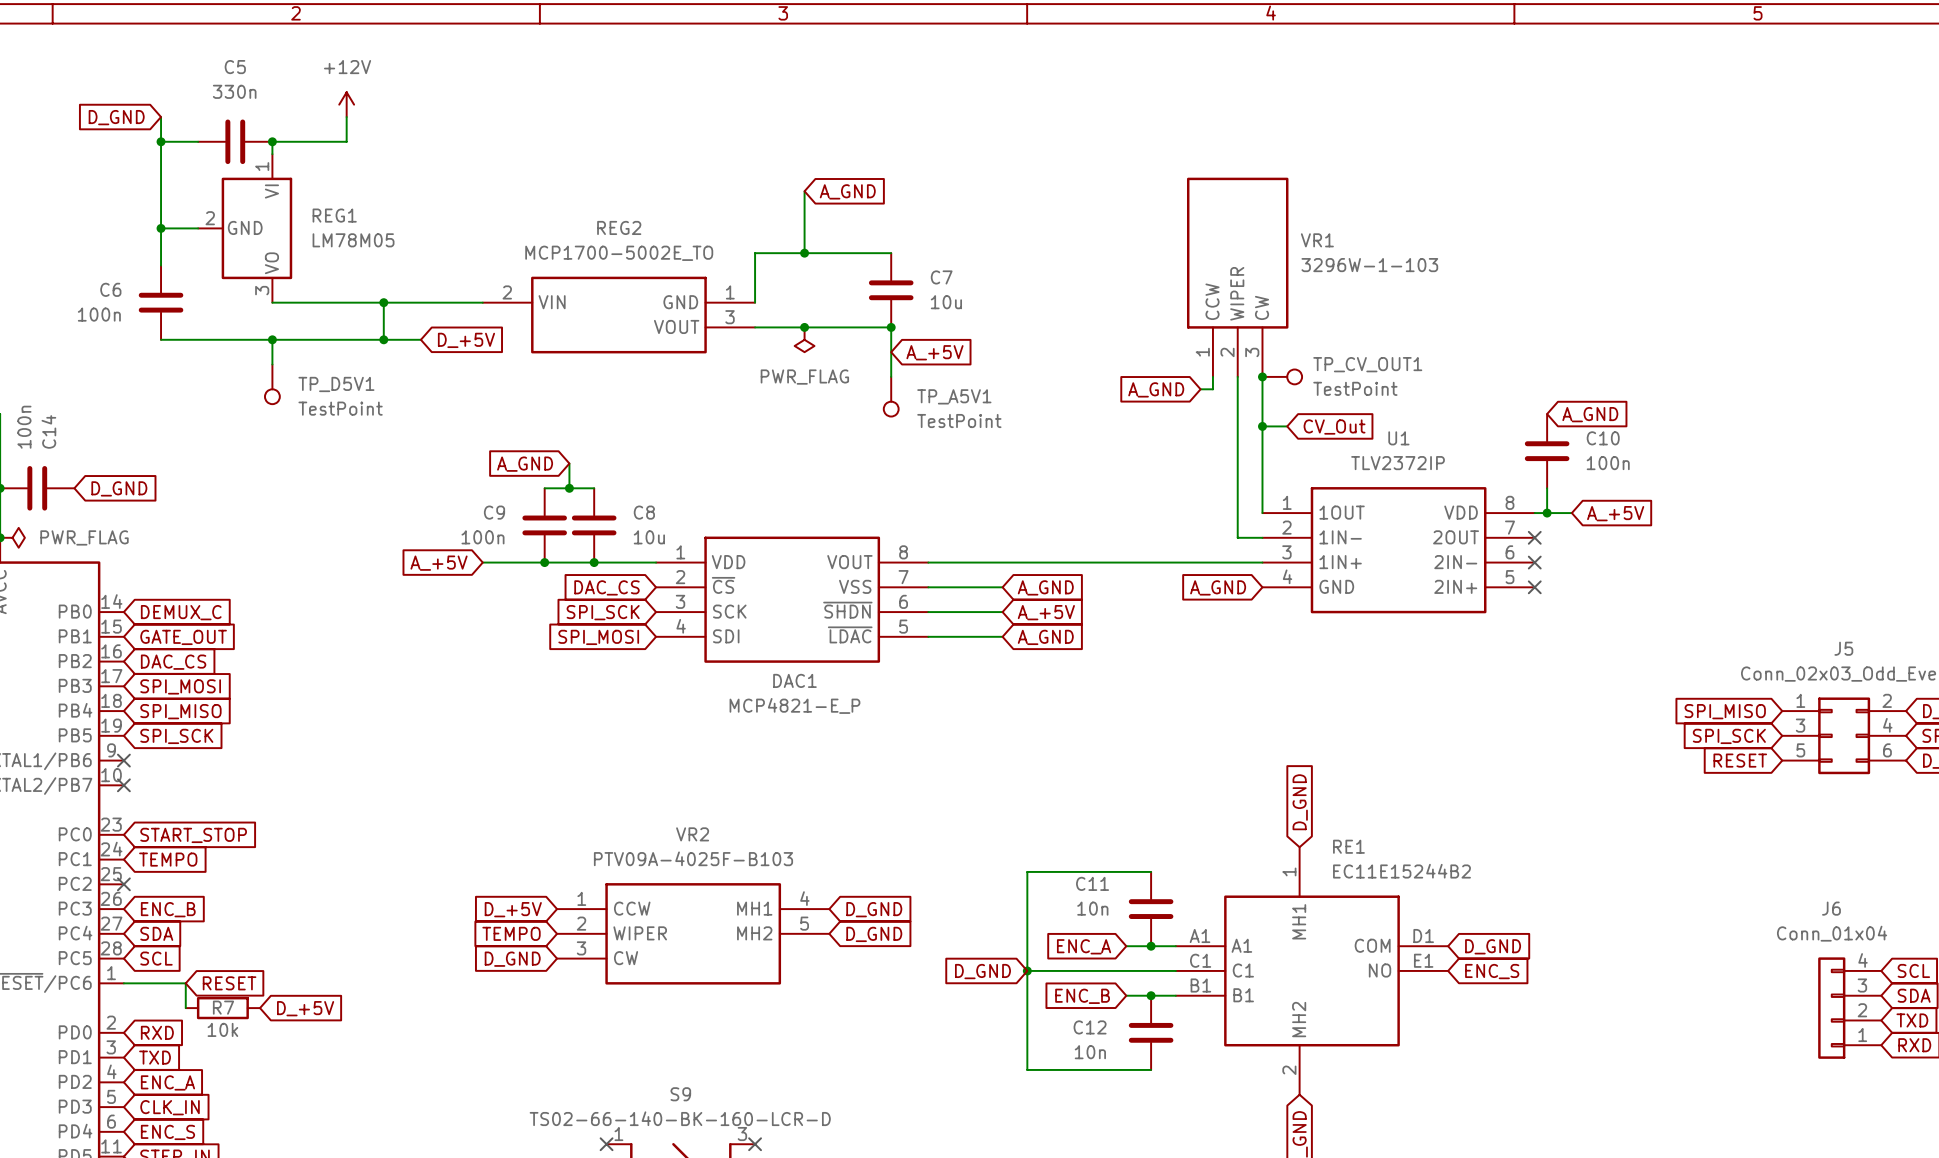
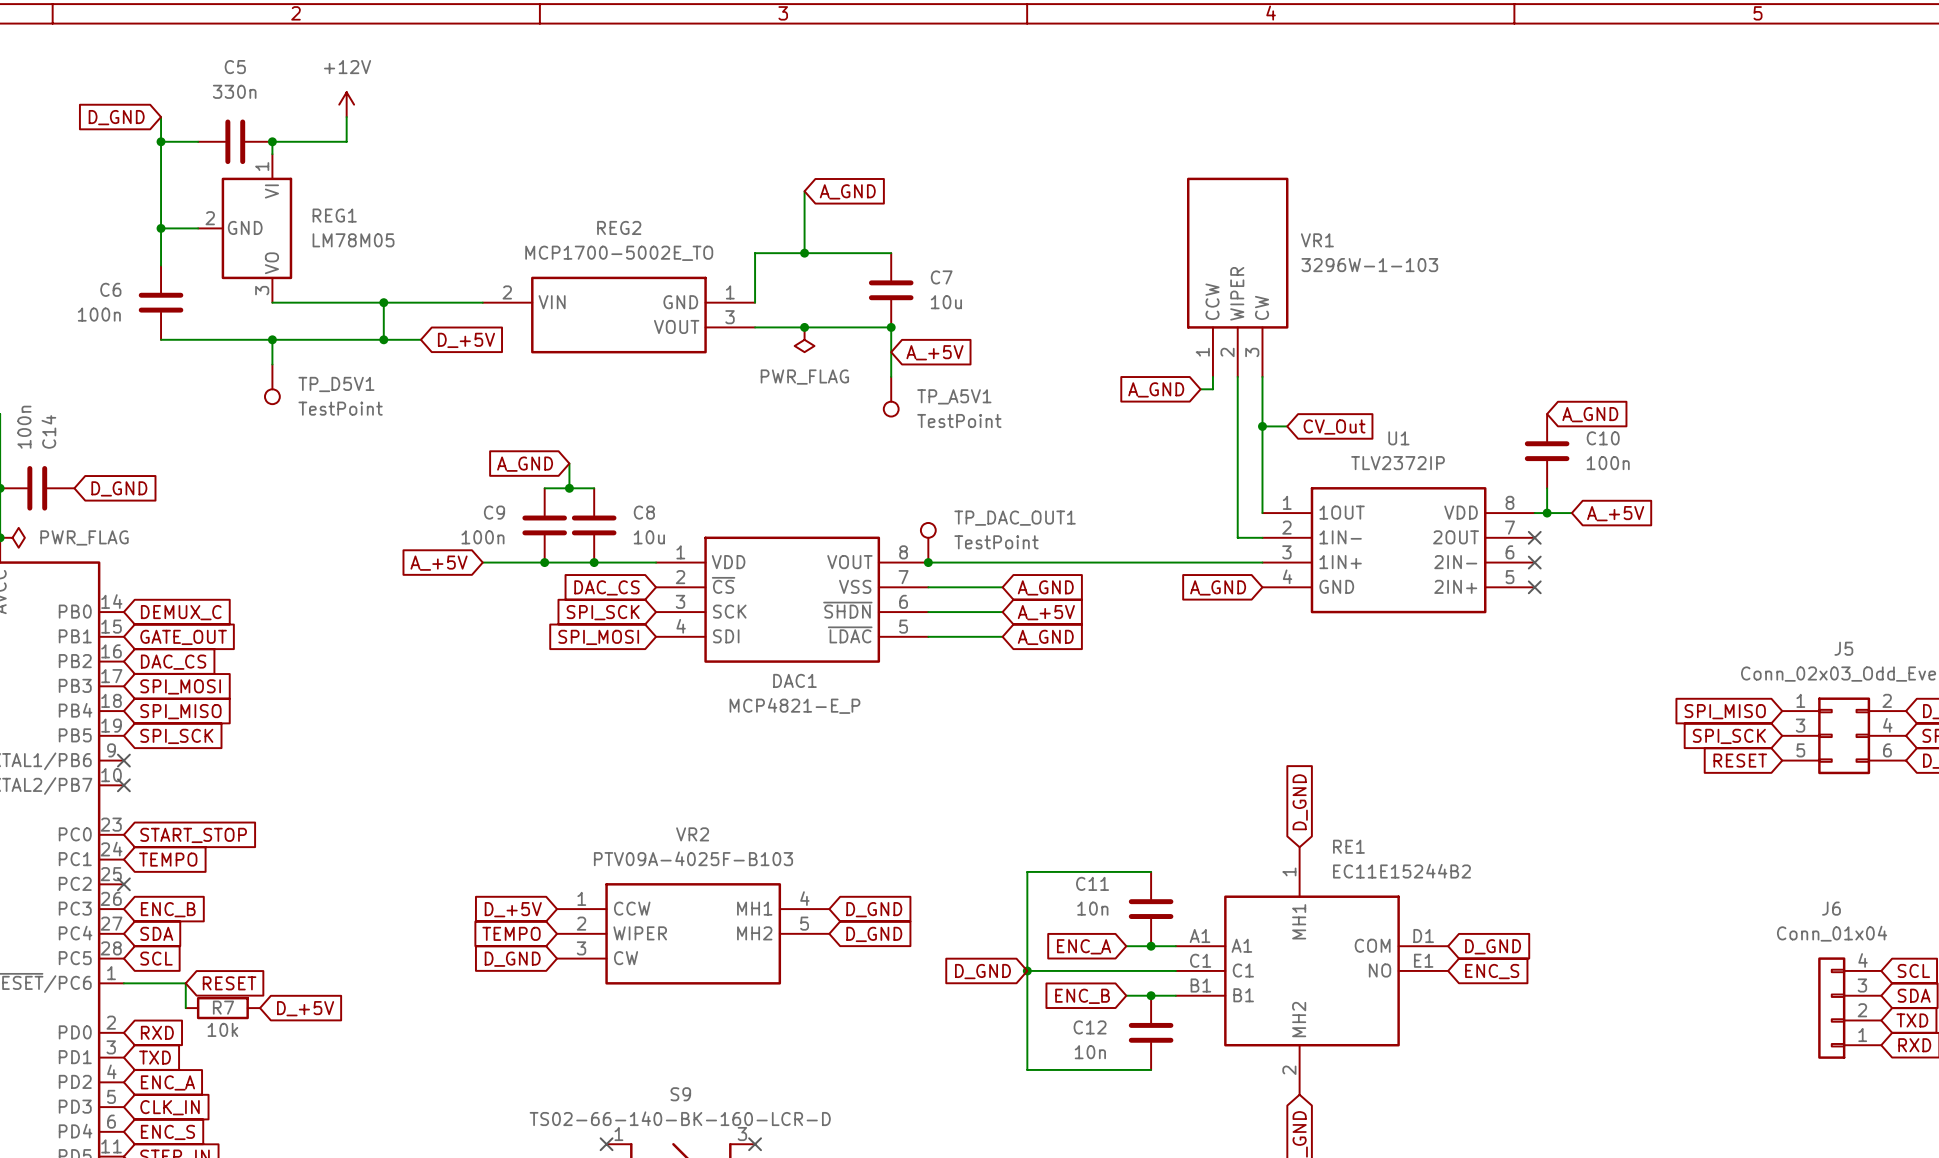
junction: (1262, 376) -> none
TP_CV_OUT1: TestPoint (1282, 376) -> none
TP_DAC_OUT1: none -> TestPoint (928, 542)
junction: none -> (928, 562)

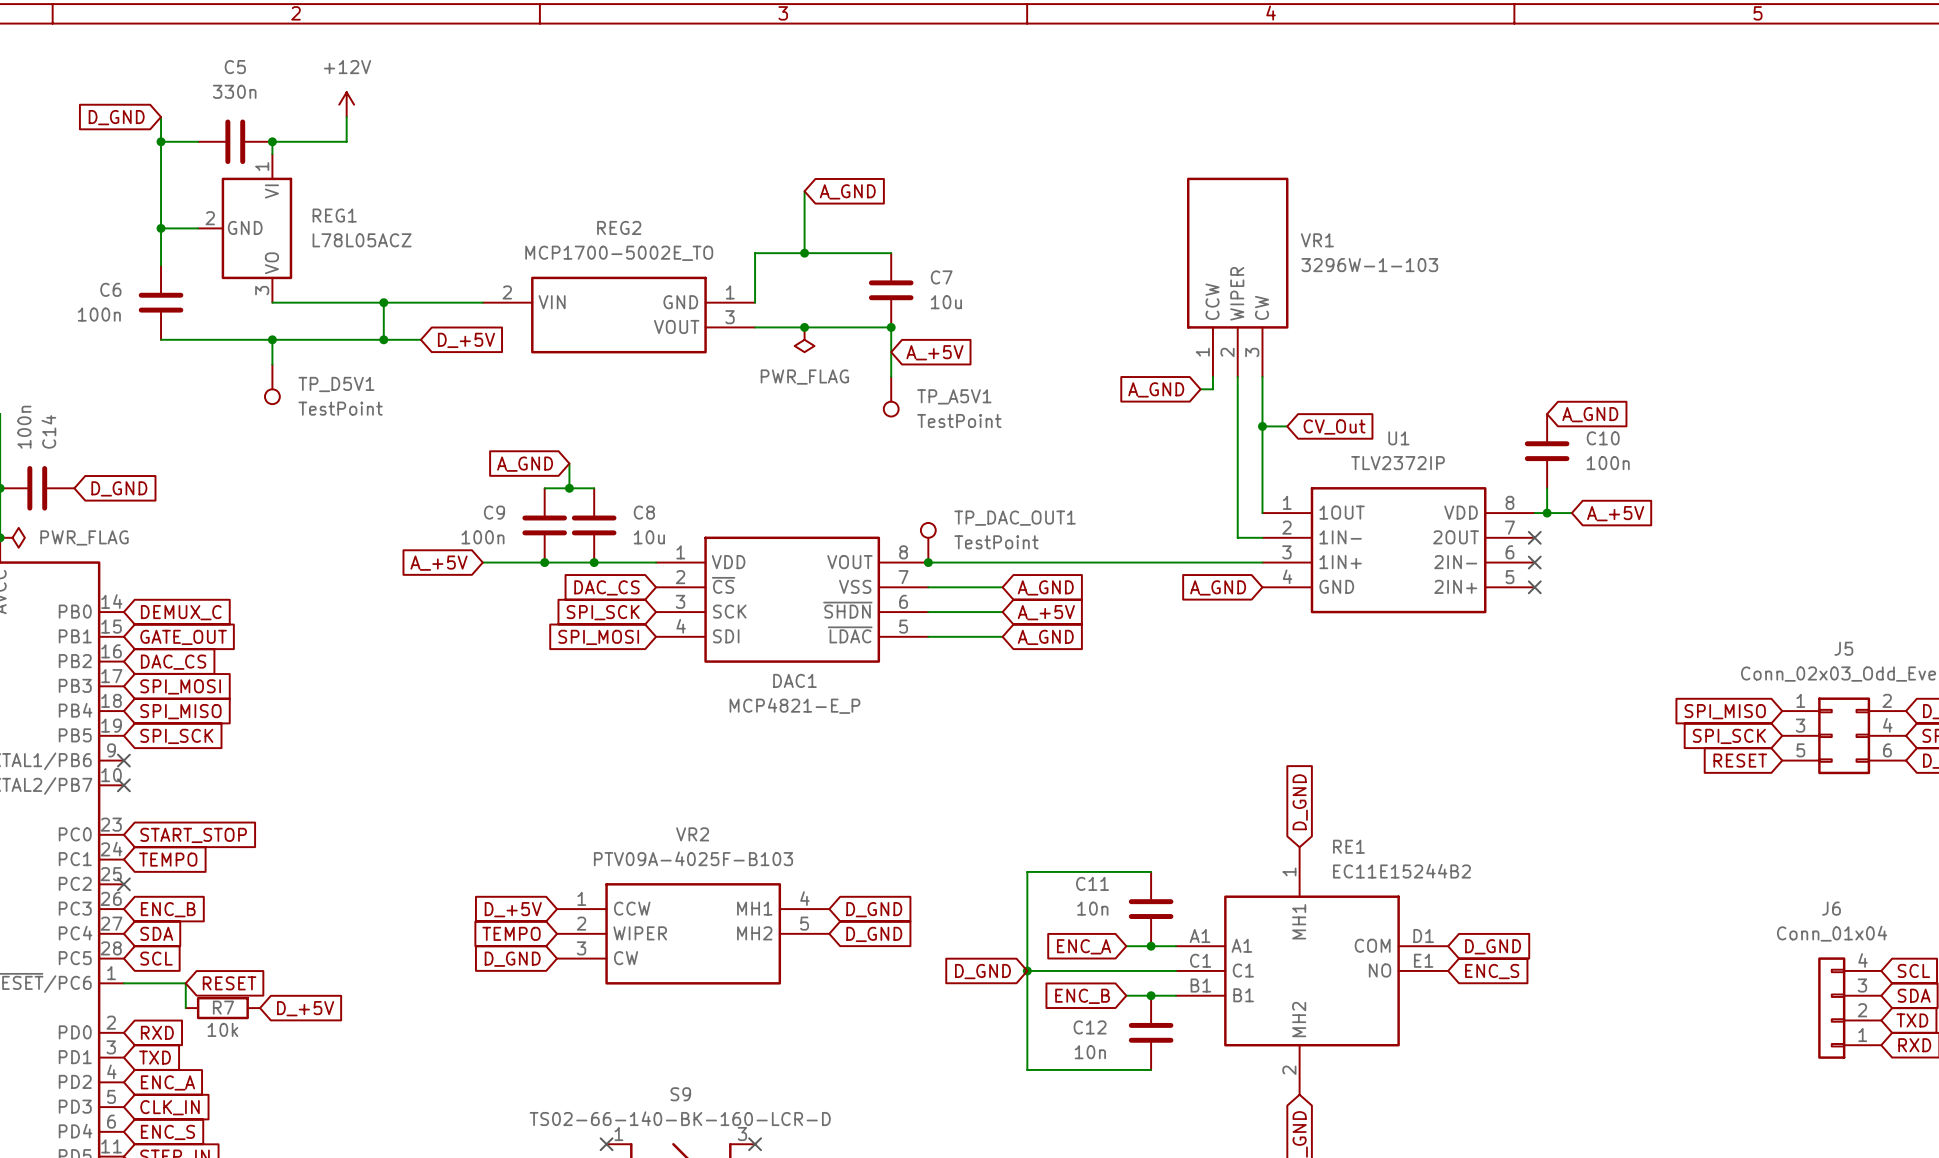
REG1 value: LM78M05 (353, 240) -> L78L05ACZ (362, 240)

